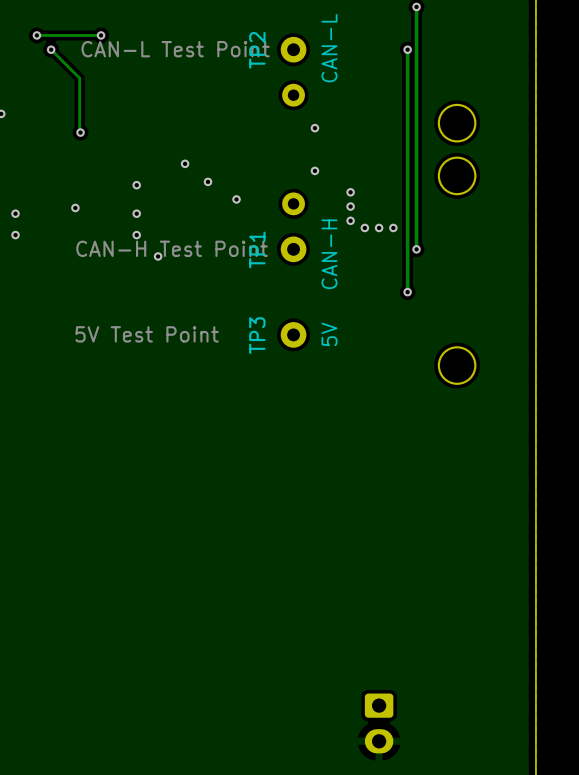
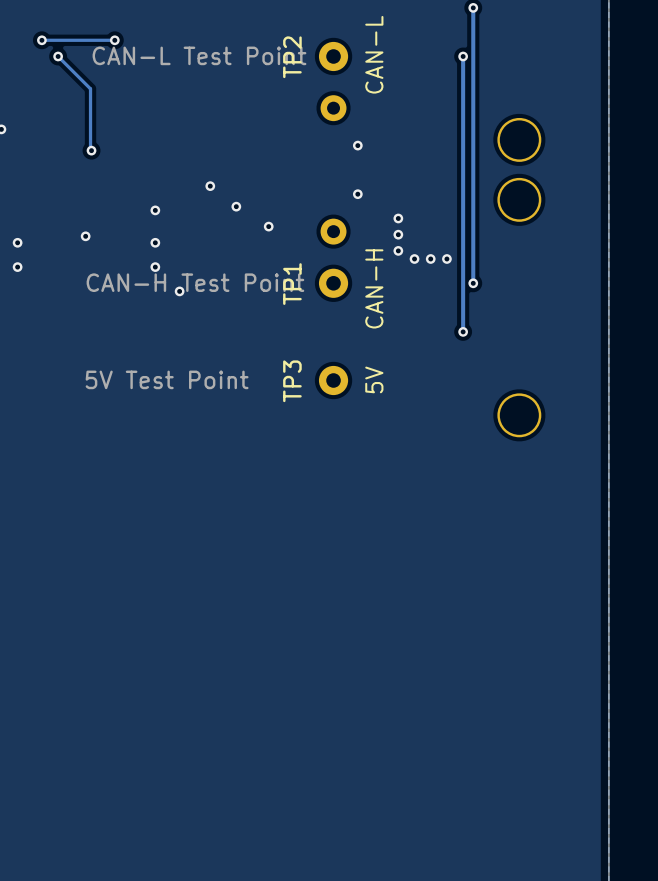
part: (379, 723) -> none

